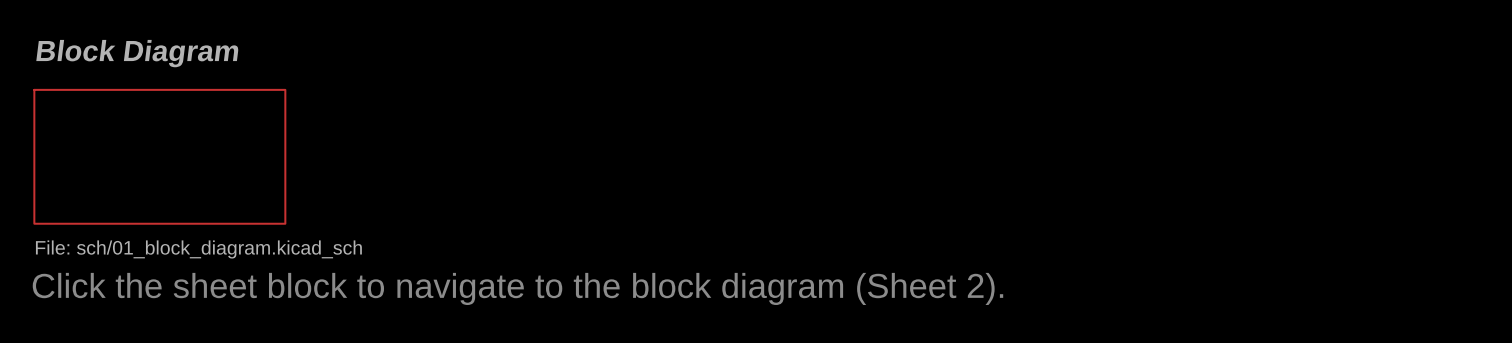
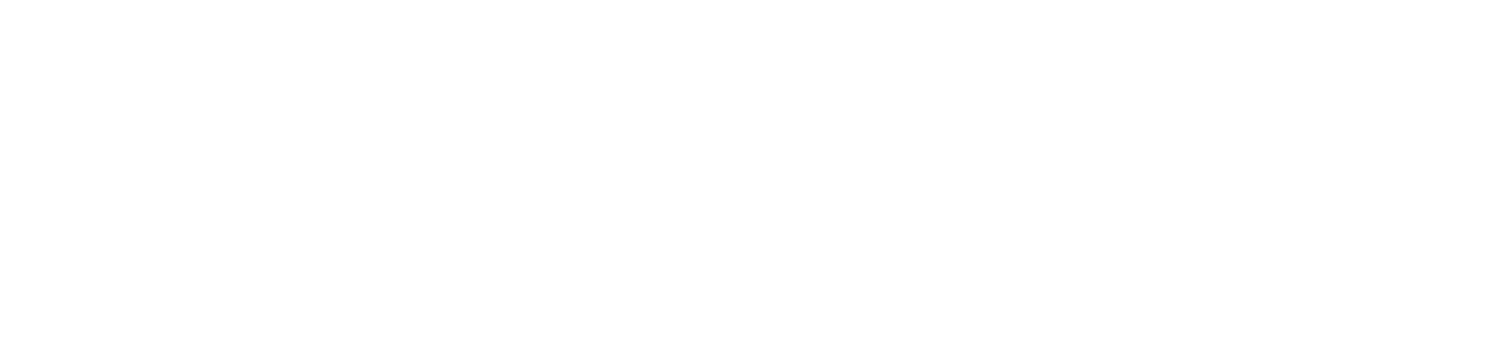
sheet Block Diagram: File: sch/01_block_diagram.kicad_sch (159, 156) -> none
text: Click the sheet block to navigate to the block diagram (Sheet 2). (517, 288) -> none

